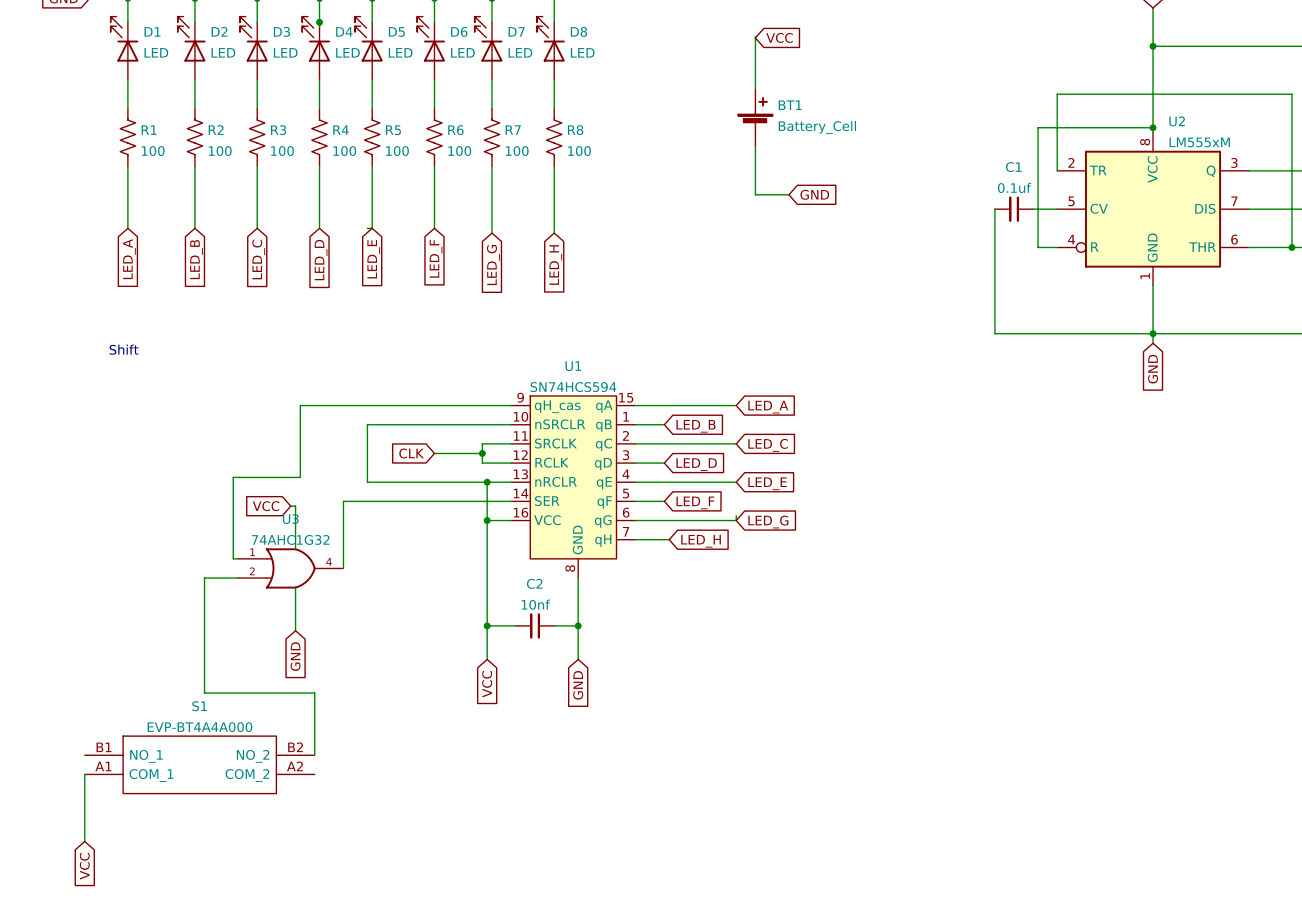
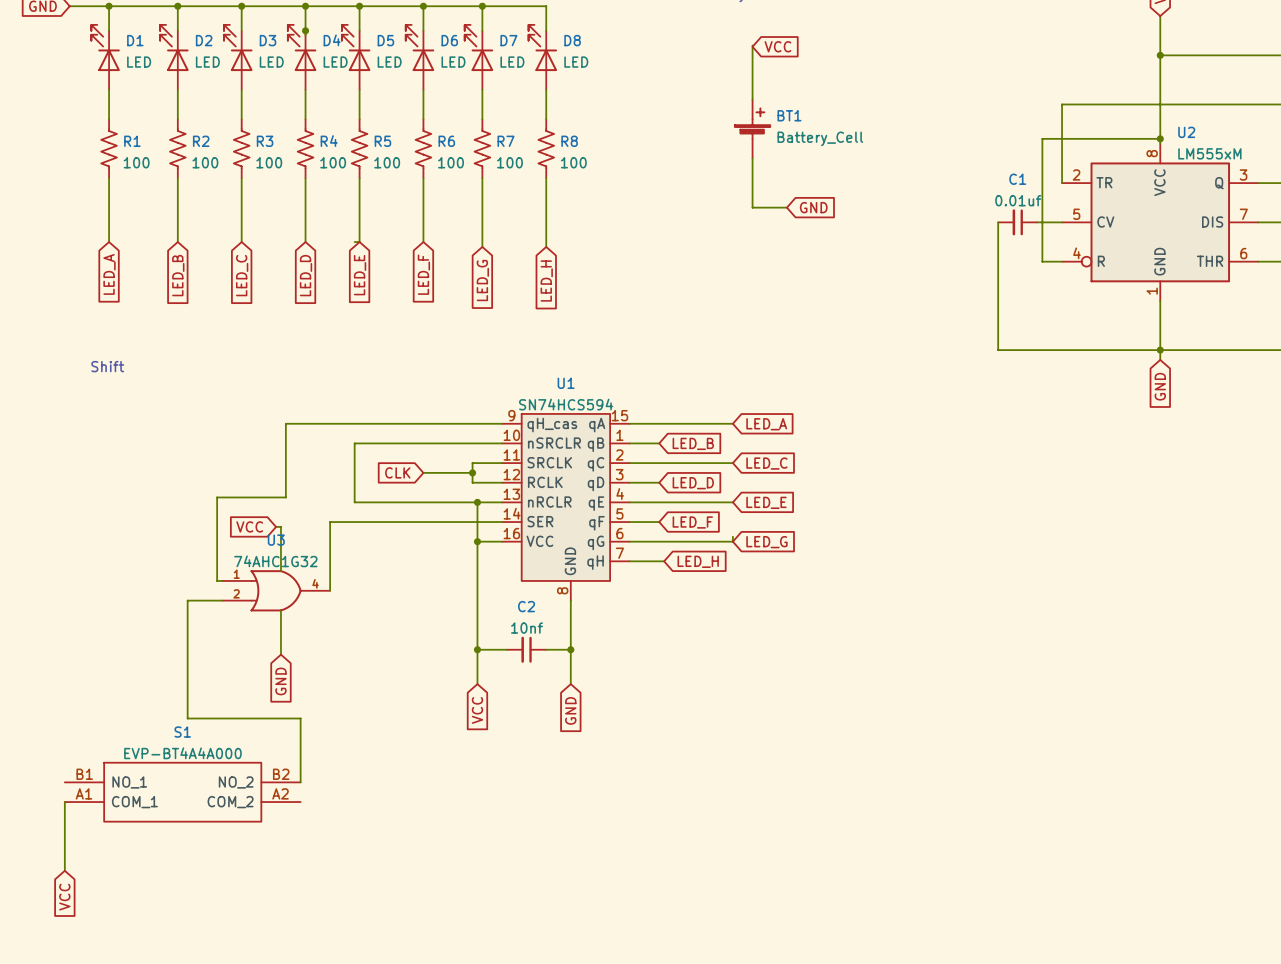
C1 value: 0.1uf (1014, 187) -> 0.01uf (1018, 200)

